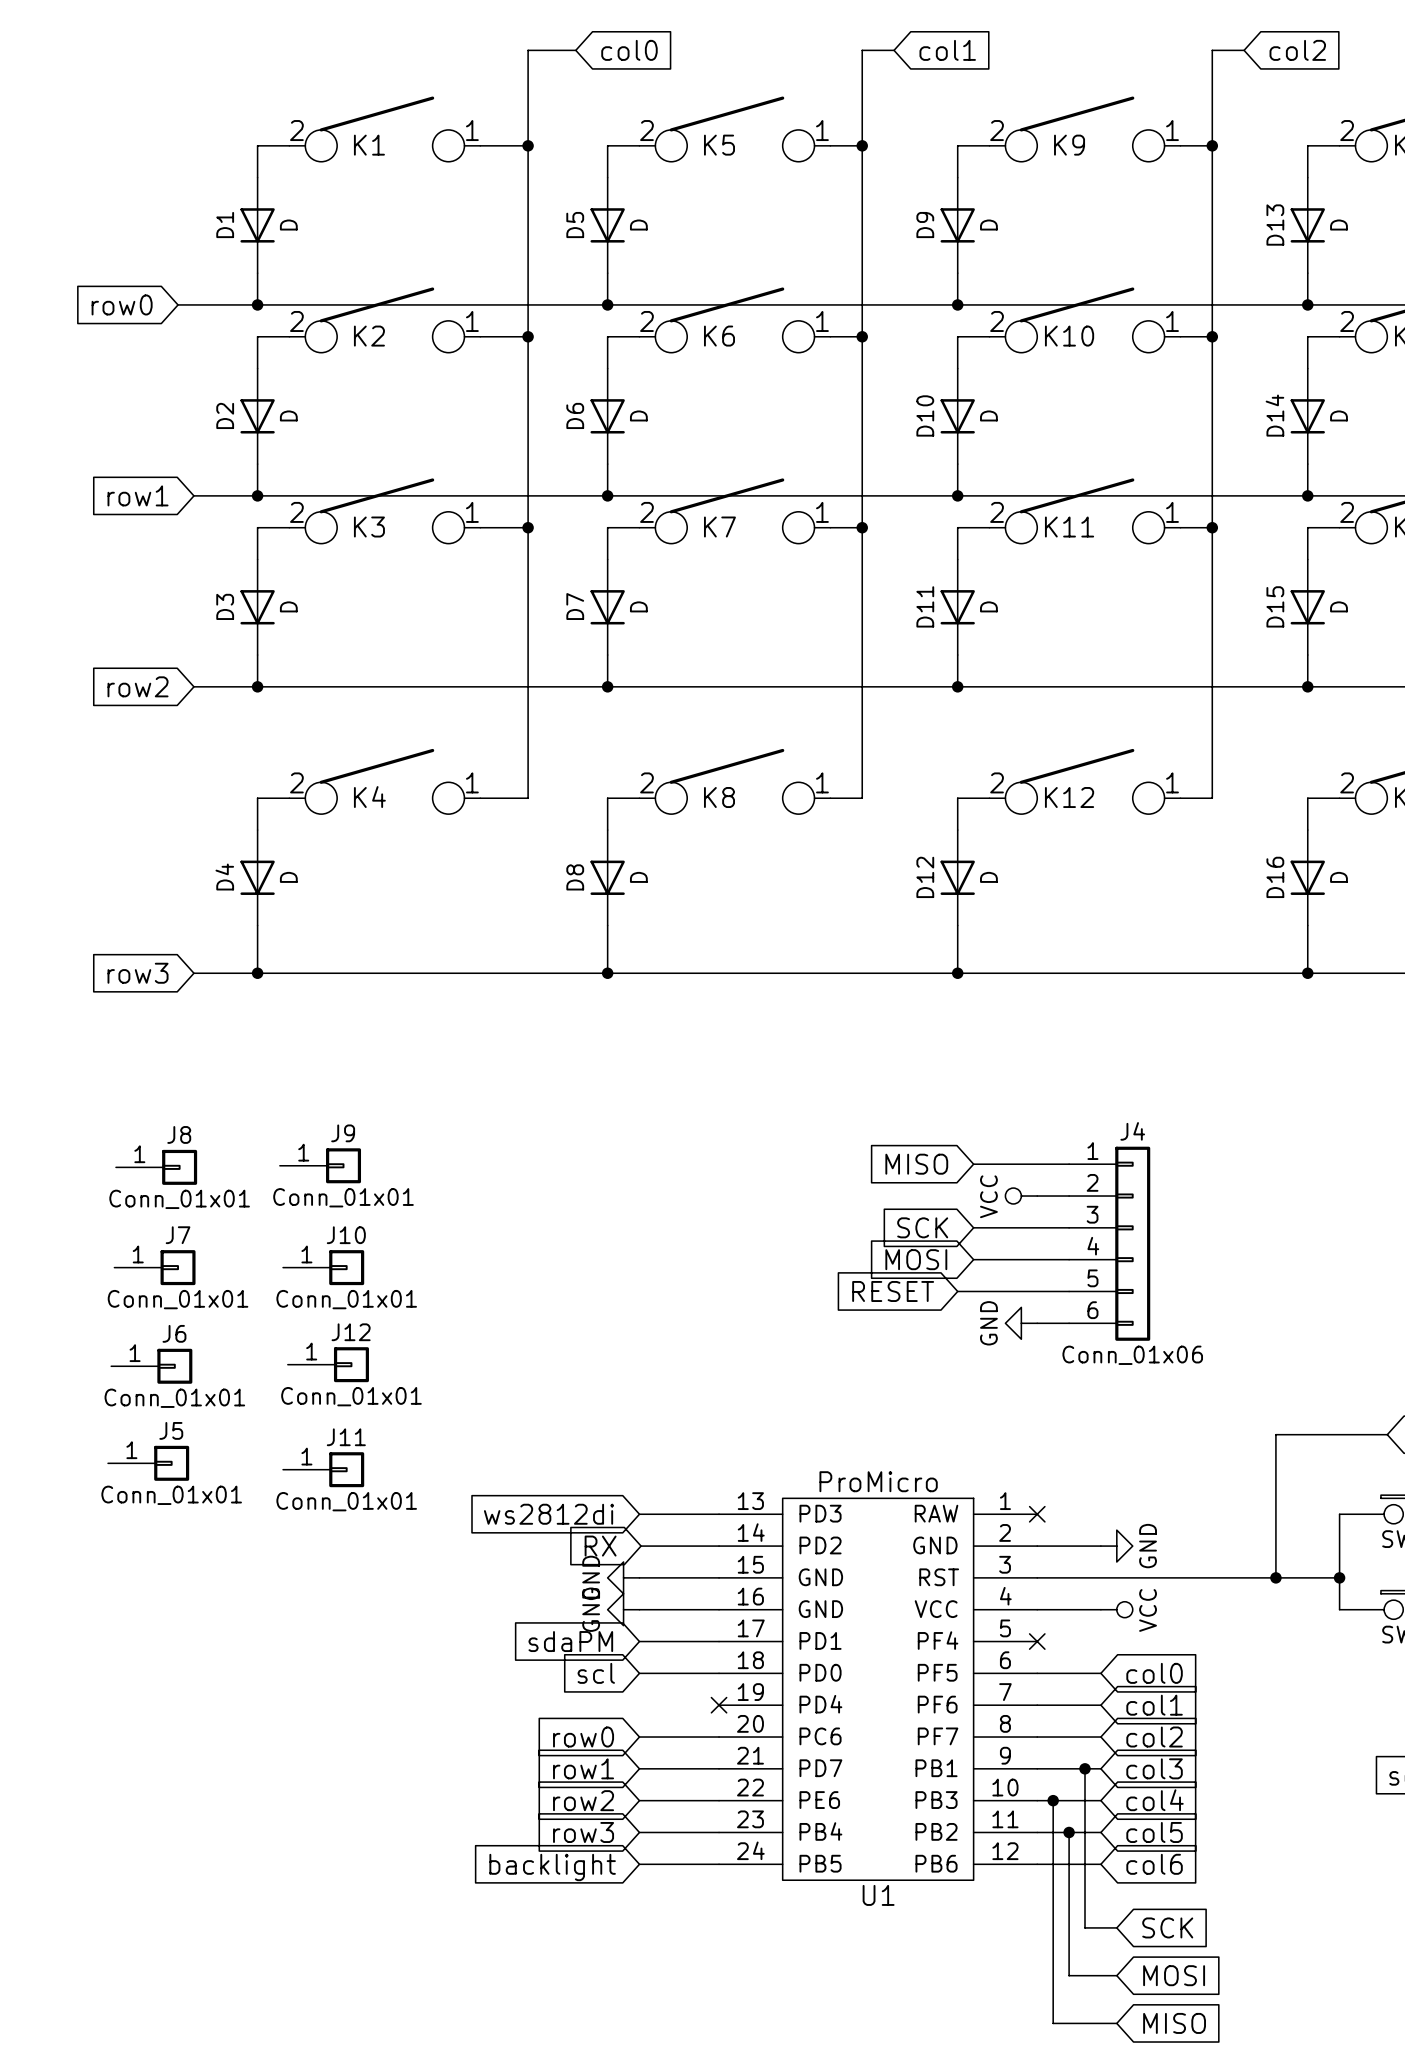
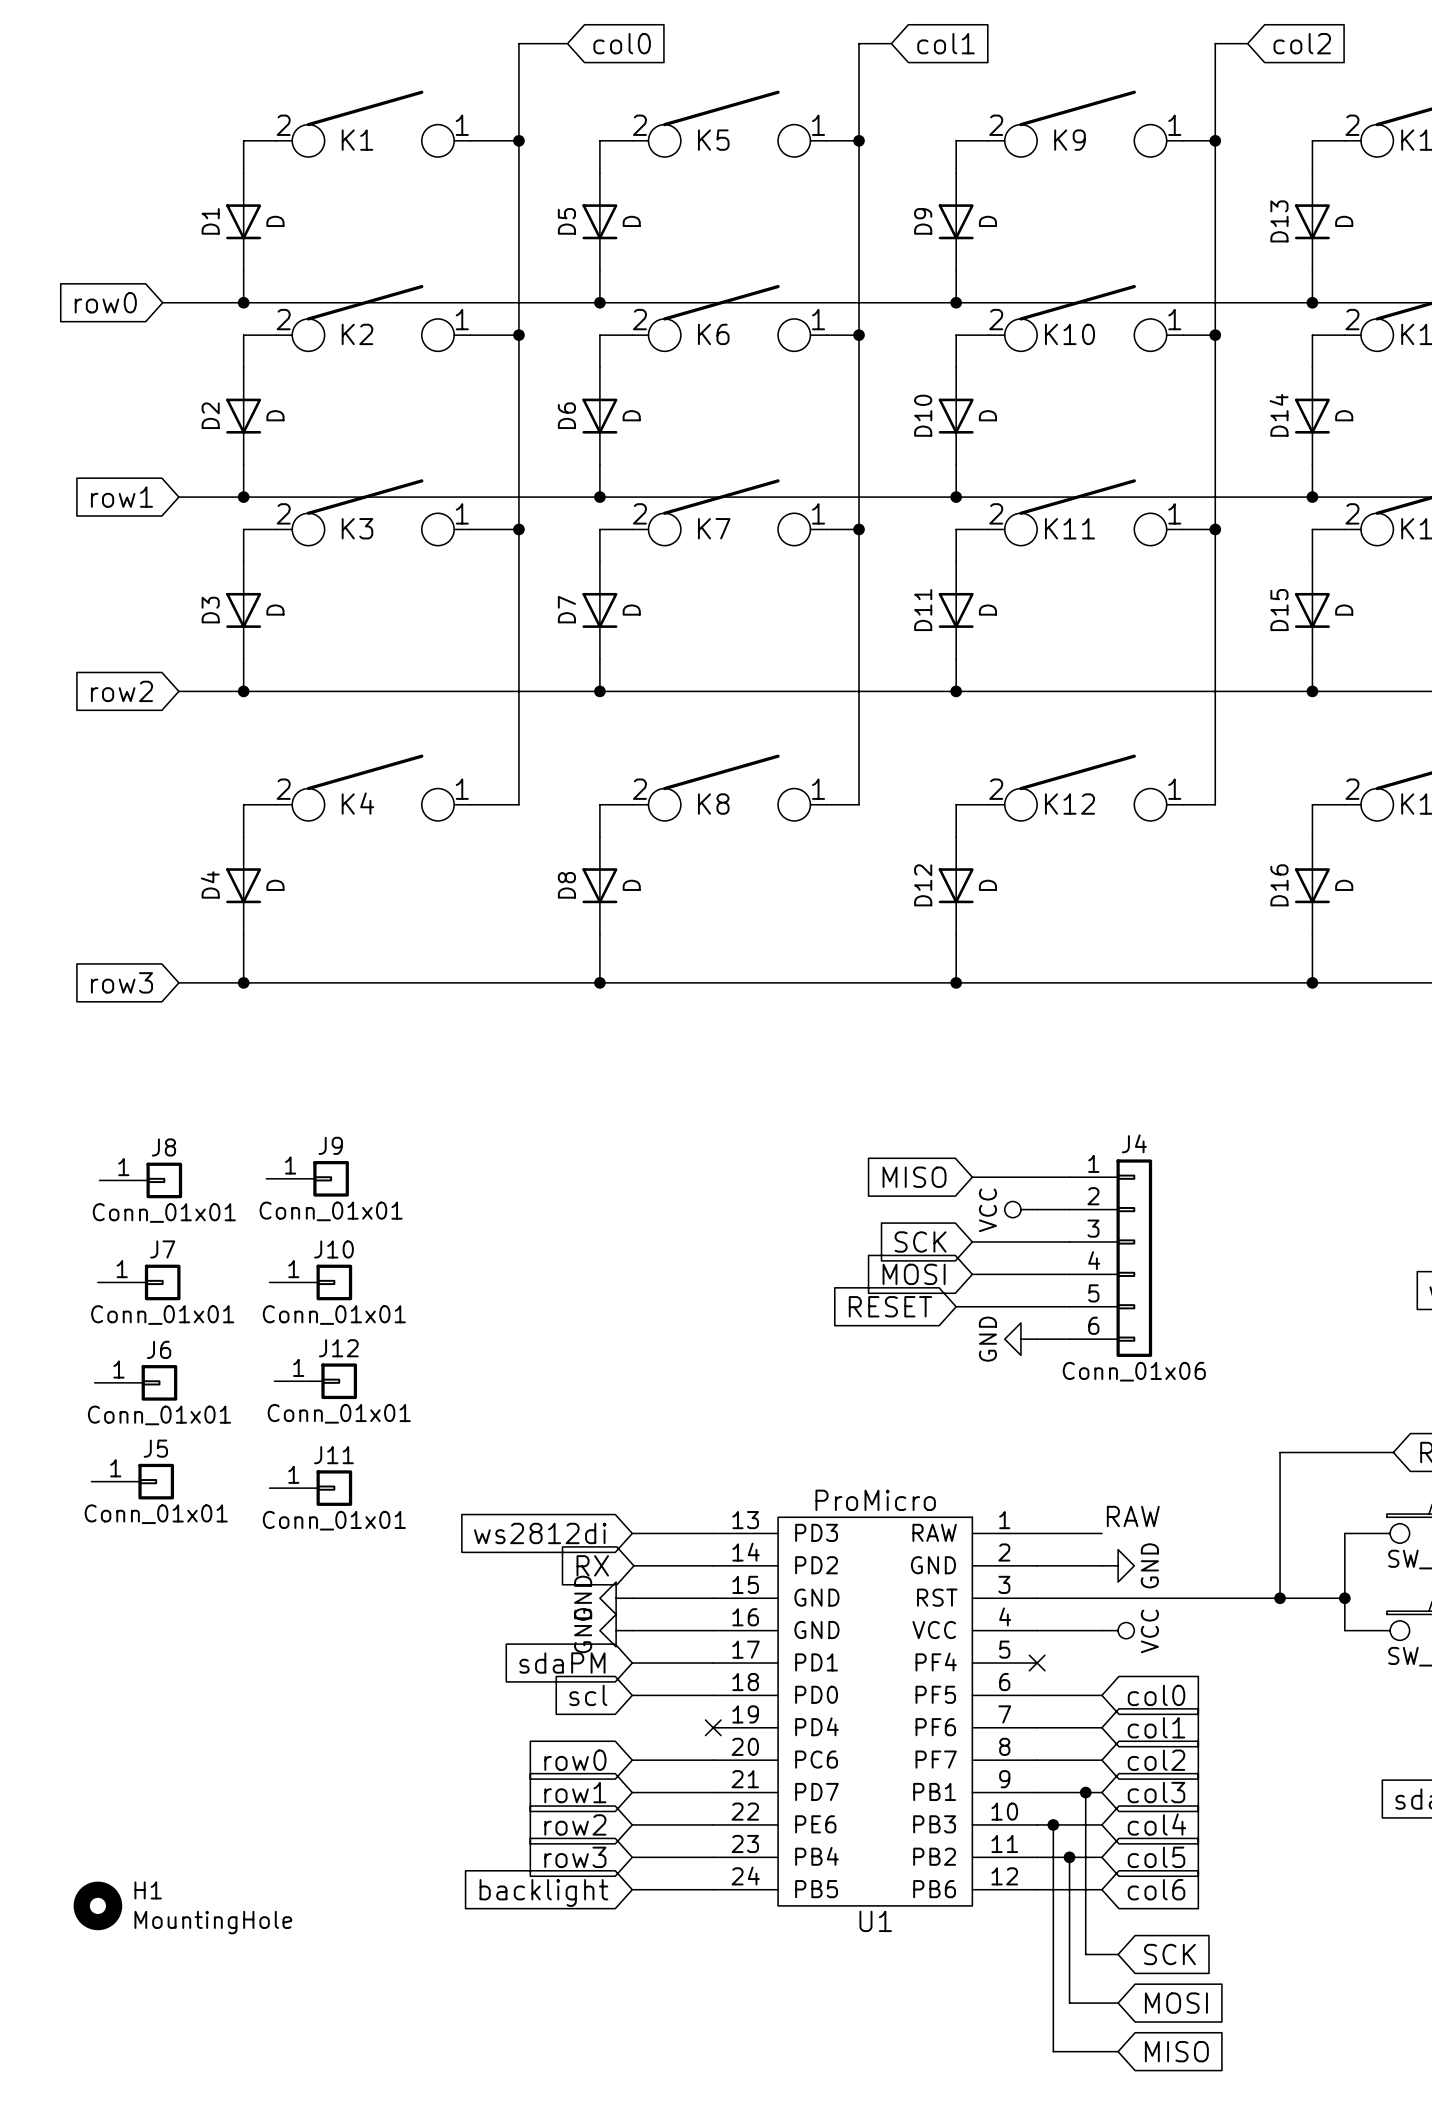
label: none -> RAW (1133, 1516)
wire: none -> (1037, 1533) (1101, 1533)
no-connect mark: (1037, 1514) -> none
H1: none -> MountingHole (97, 1905)

